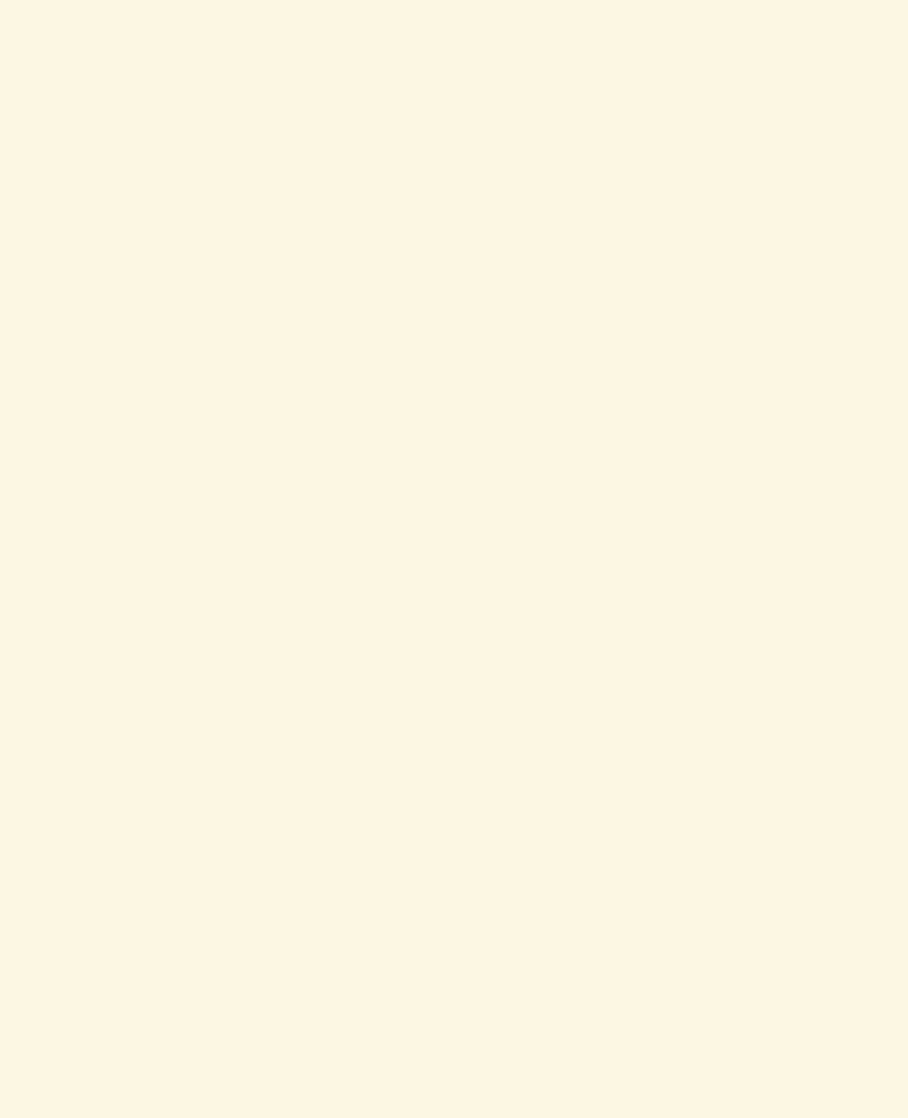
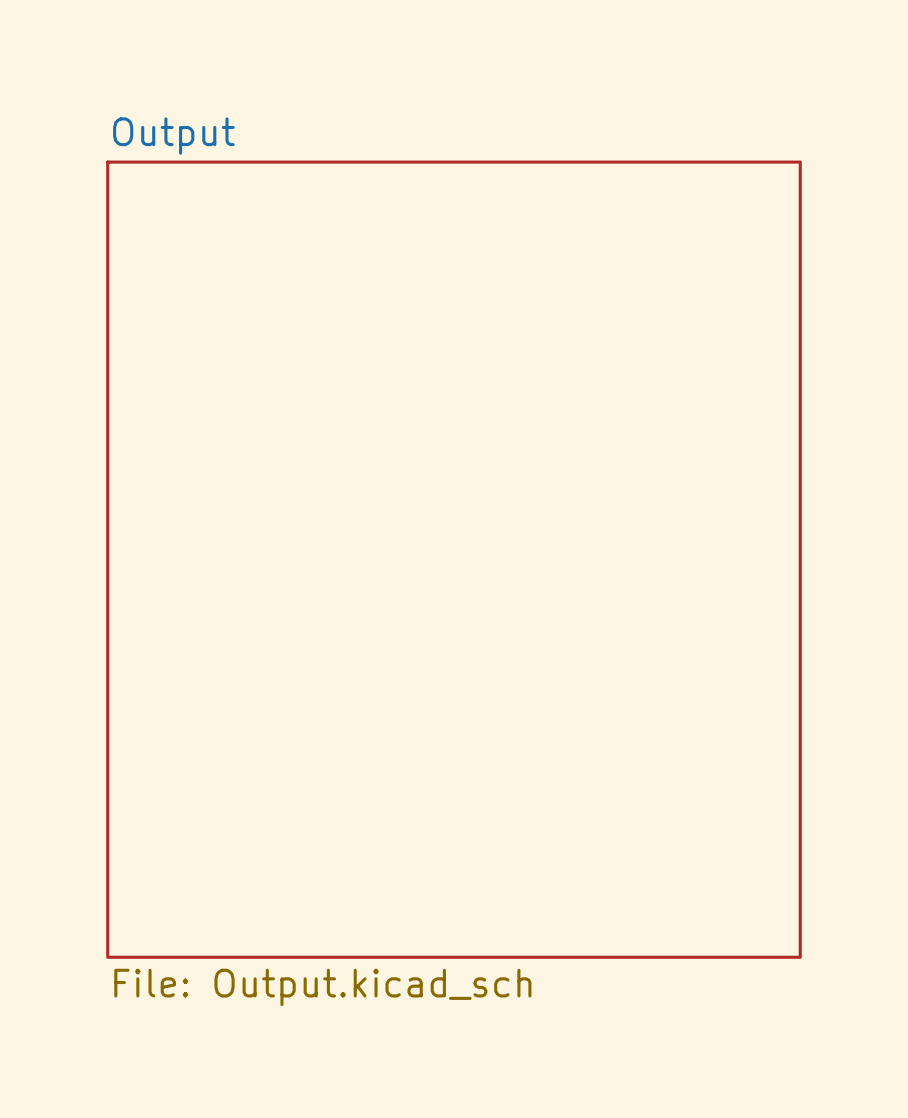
sheet Output: none -> File: Output.kicad_sch (453, 559)

